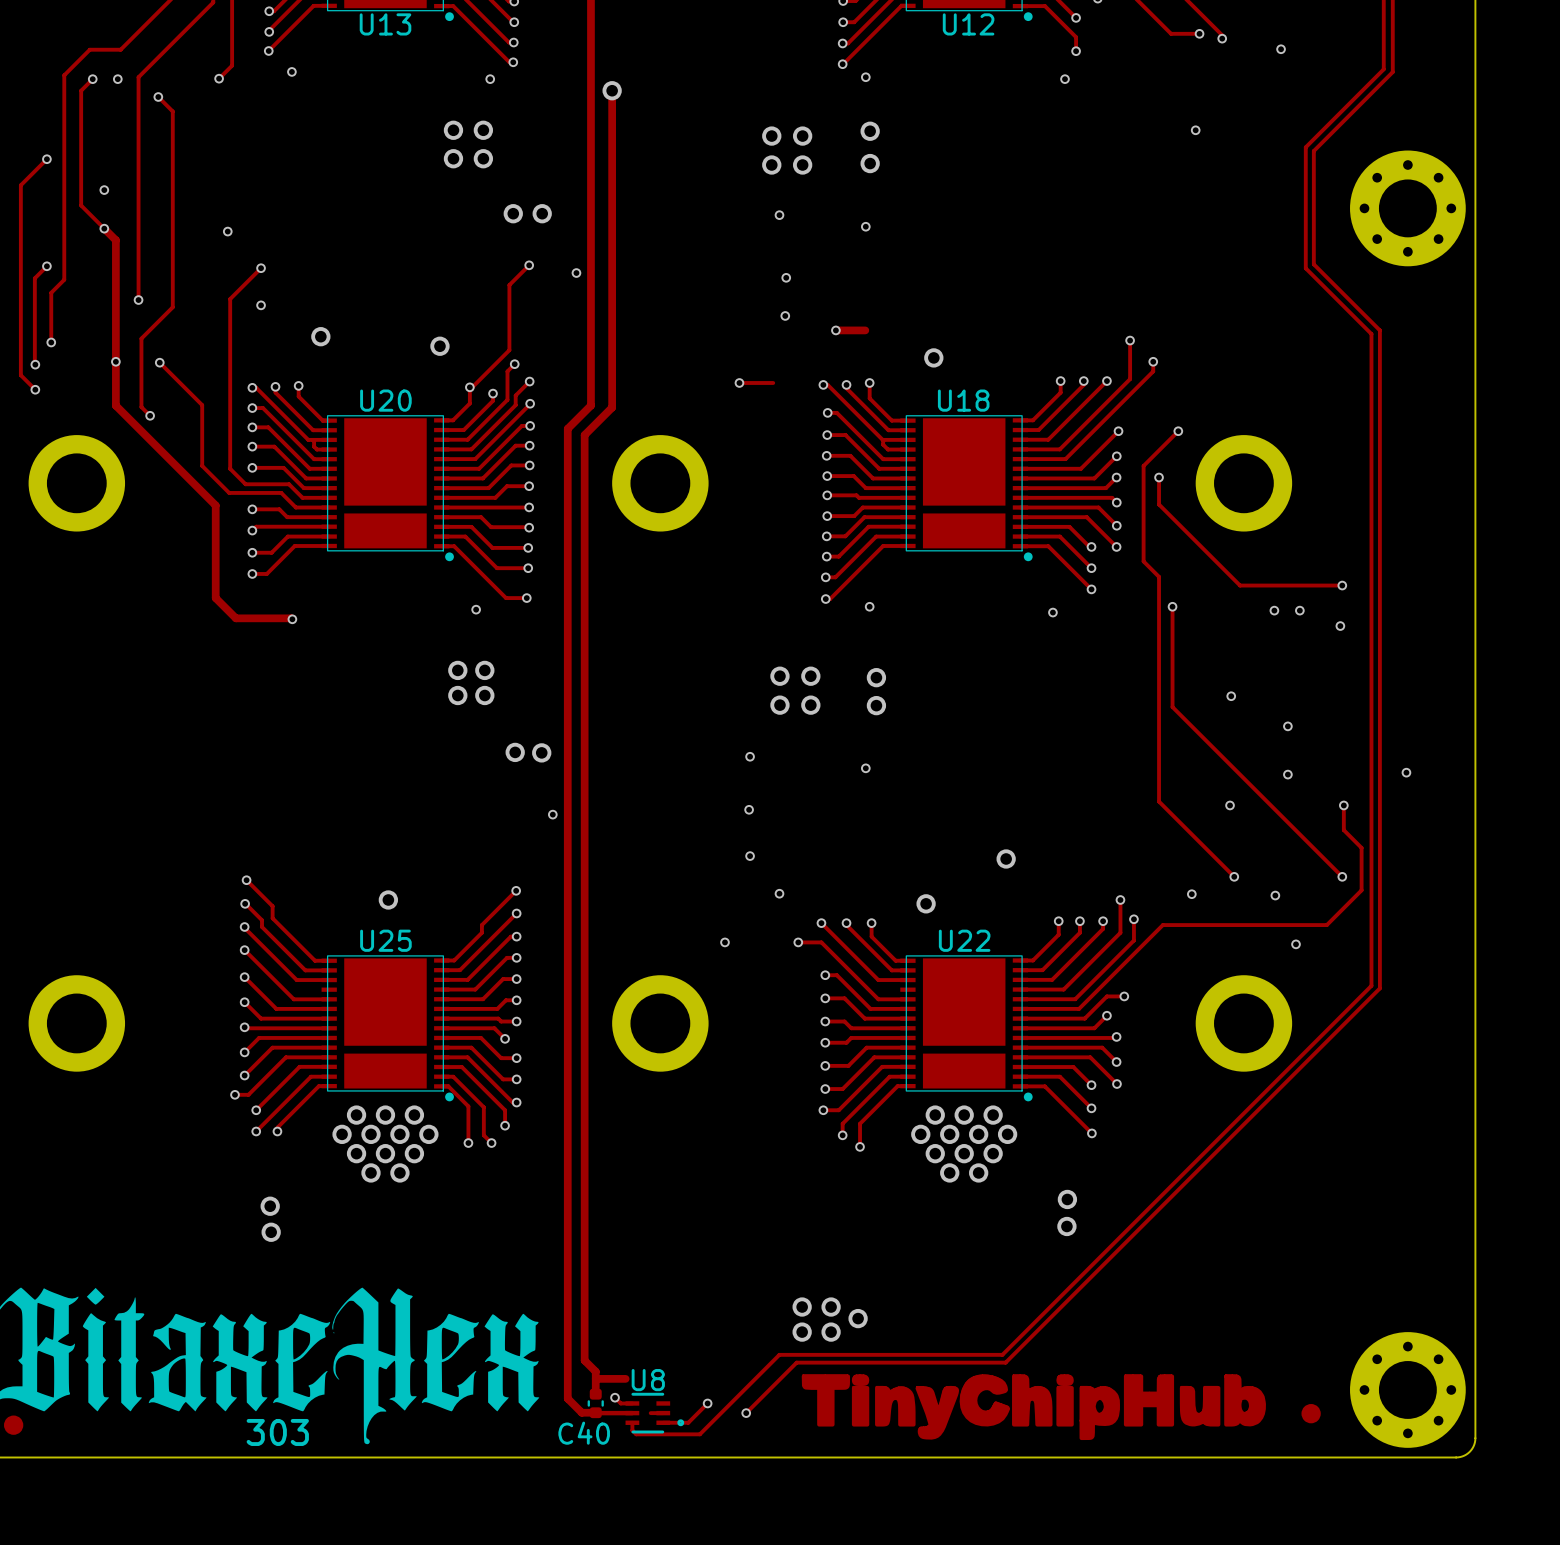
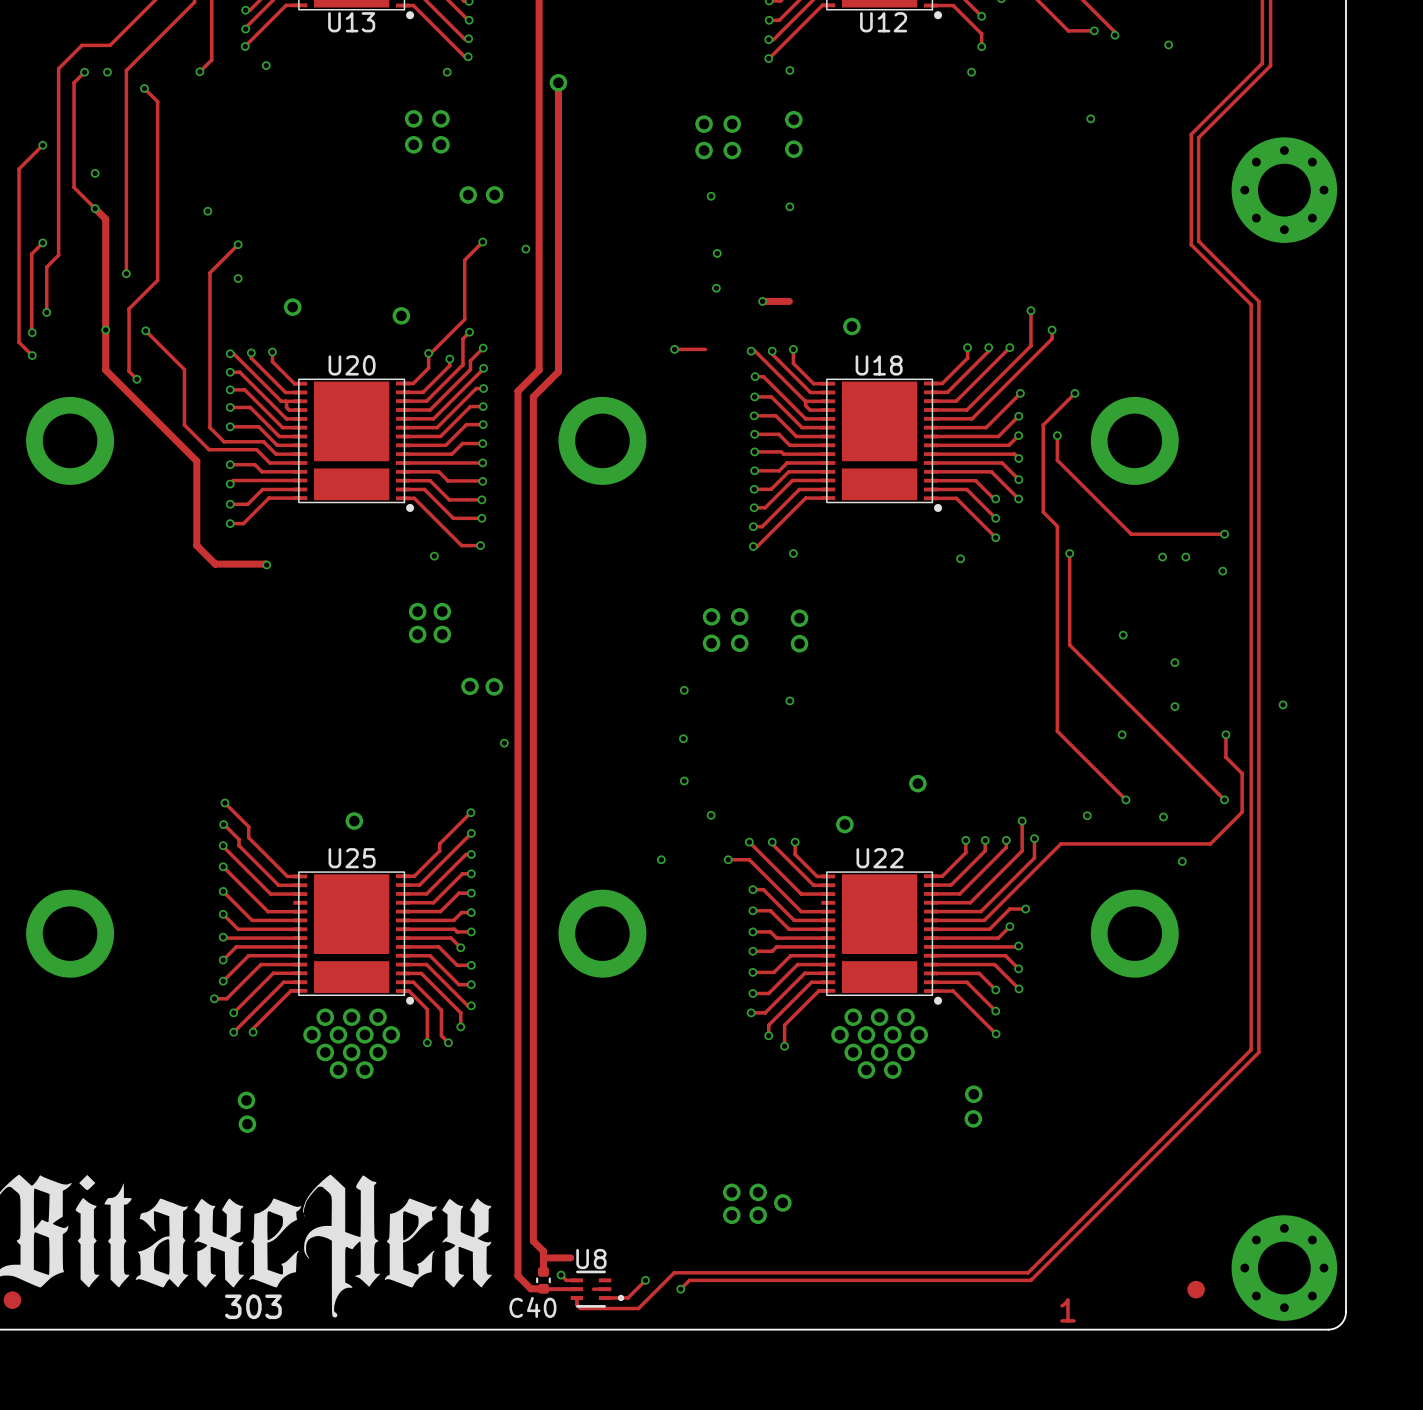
track: (1371, 985) (1002, 1354) (779, 1354) (739, 1395) -> (1251, 899) (1251, 1049) (1028, 1272) (674, 1272)
track: (1379, 988) (1005, 1362) (796, 1362) (755, 1403) -> (1258, 901) (1258, 1052) (1030, 1280) (689, 1280)
drawing: [801, 1374, 1266, 1441] -> none
text: none -> 1 (1067, 1310)

